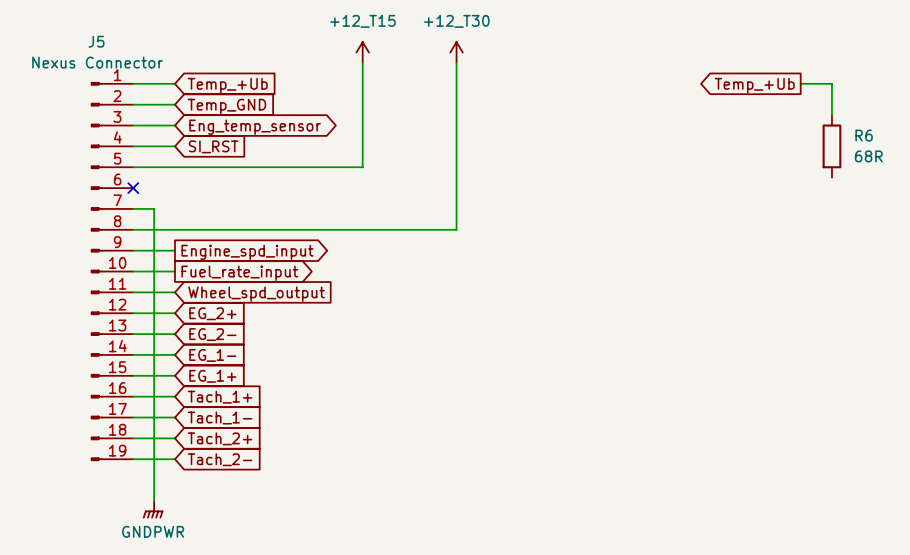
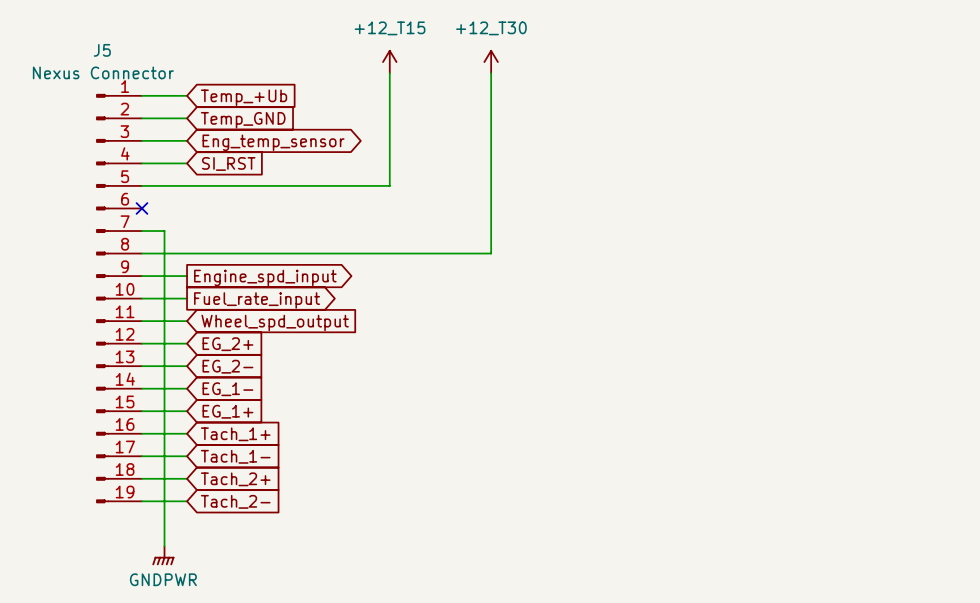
wire: (800, 83) (831, 83) (831, 115) -> none
global label: Temp_+Ub (754, 85) -> none
R6: 68R (831, 146) -> none

